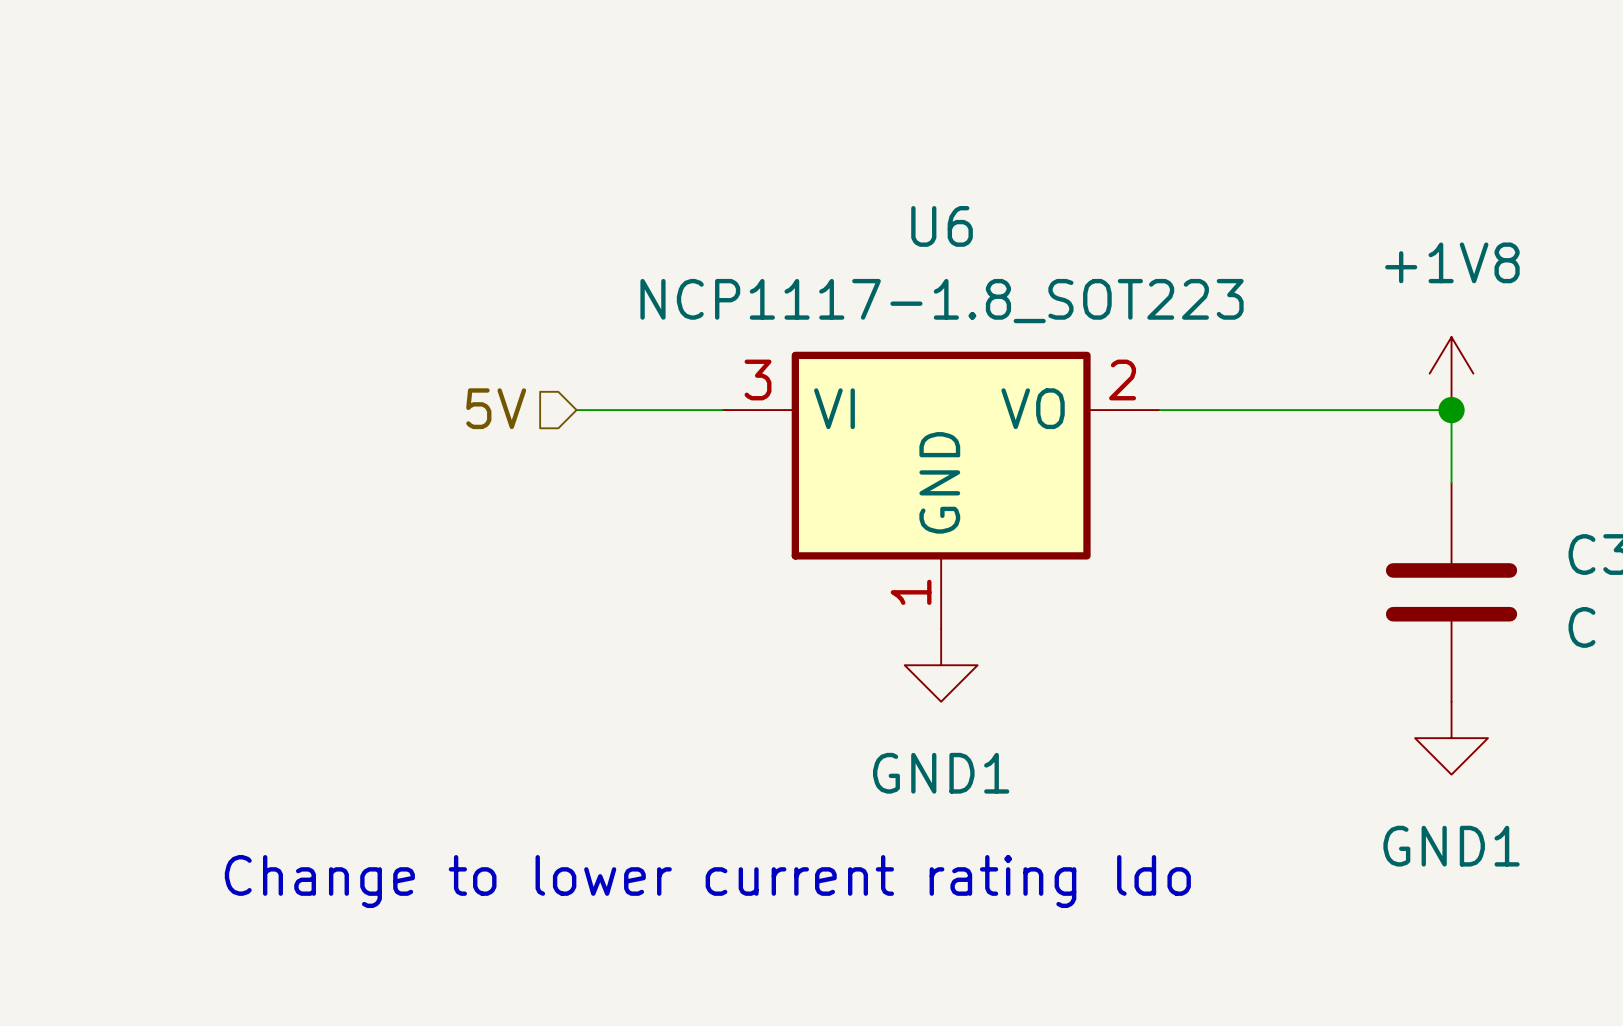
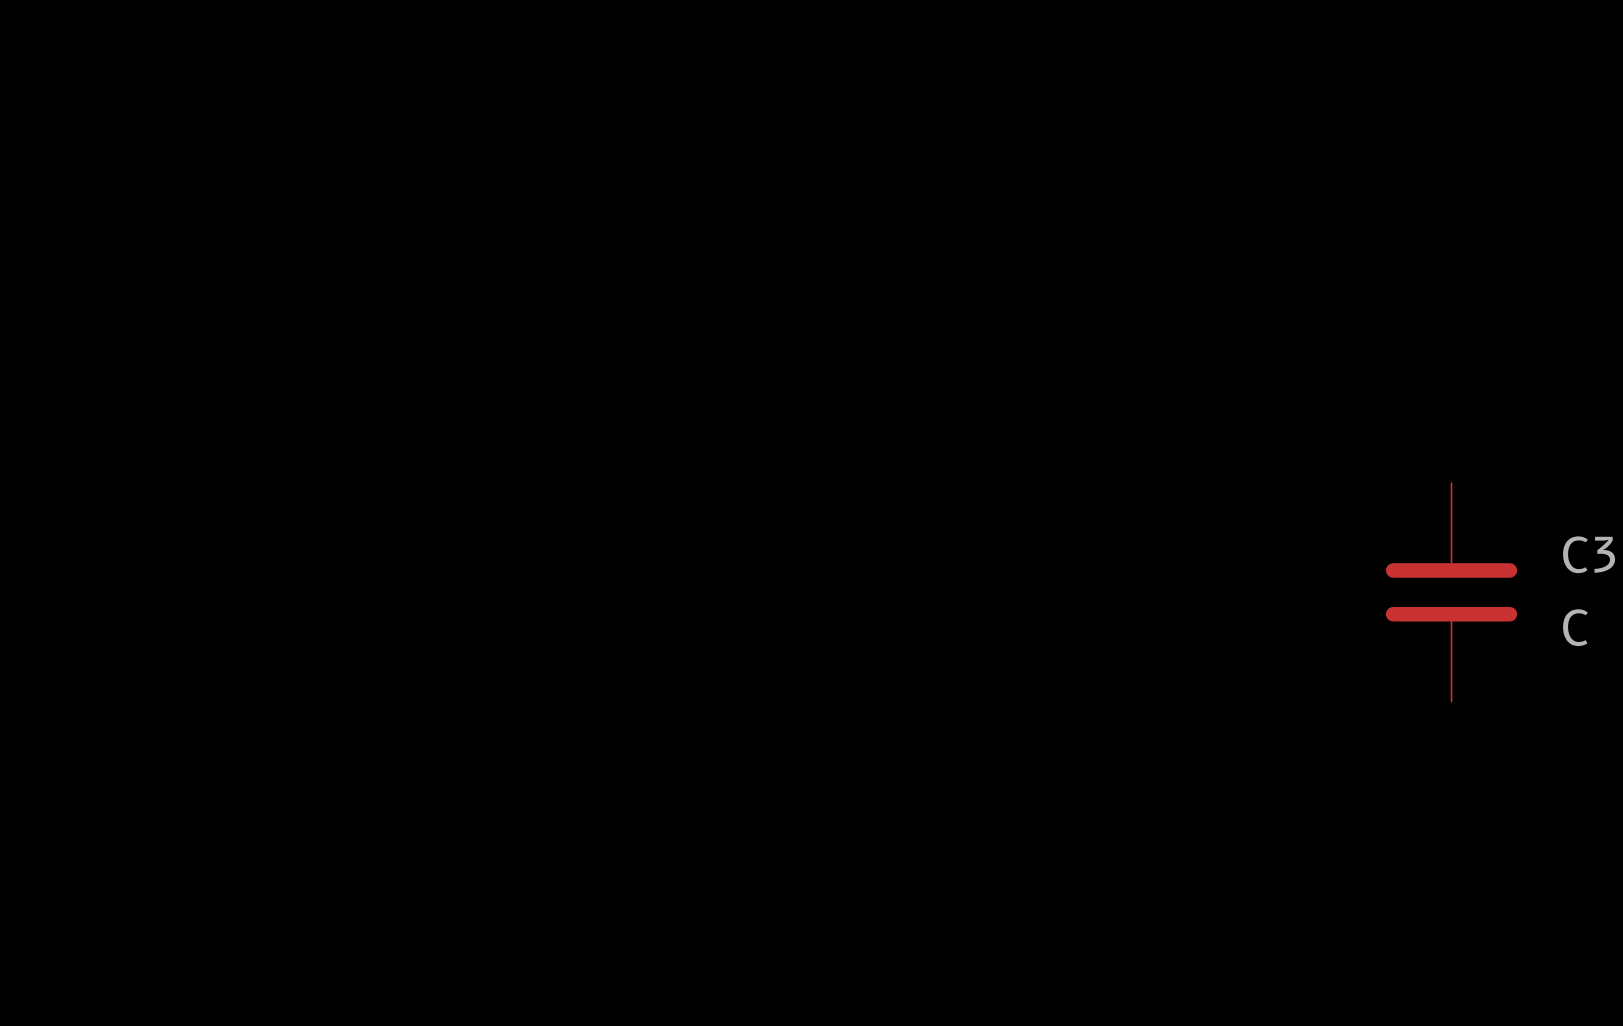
power symbol: +1V8 (1451, 373) -> none
hierarchical label: 5V (496, 408) -> none
wire: (576, 410) (722, 410) -> none
wire: (1159, 410) (1451, 410) (1451, 482) -> none
junction: (1451, 410) -> none
U6: NCP1117-1.8_SOT223 (941, 490) -> none
power symbol: GND1 (941, 665) -> none
power symbol: GND1 (1451, 738) -> none
text: Change to lower current rating ldo (707, 881) -> none

